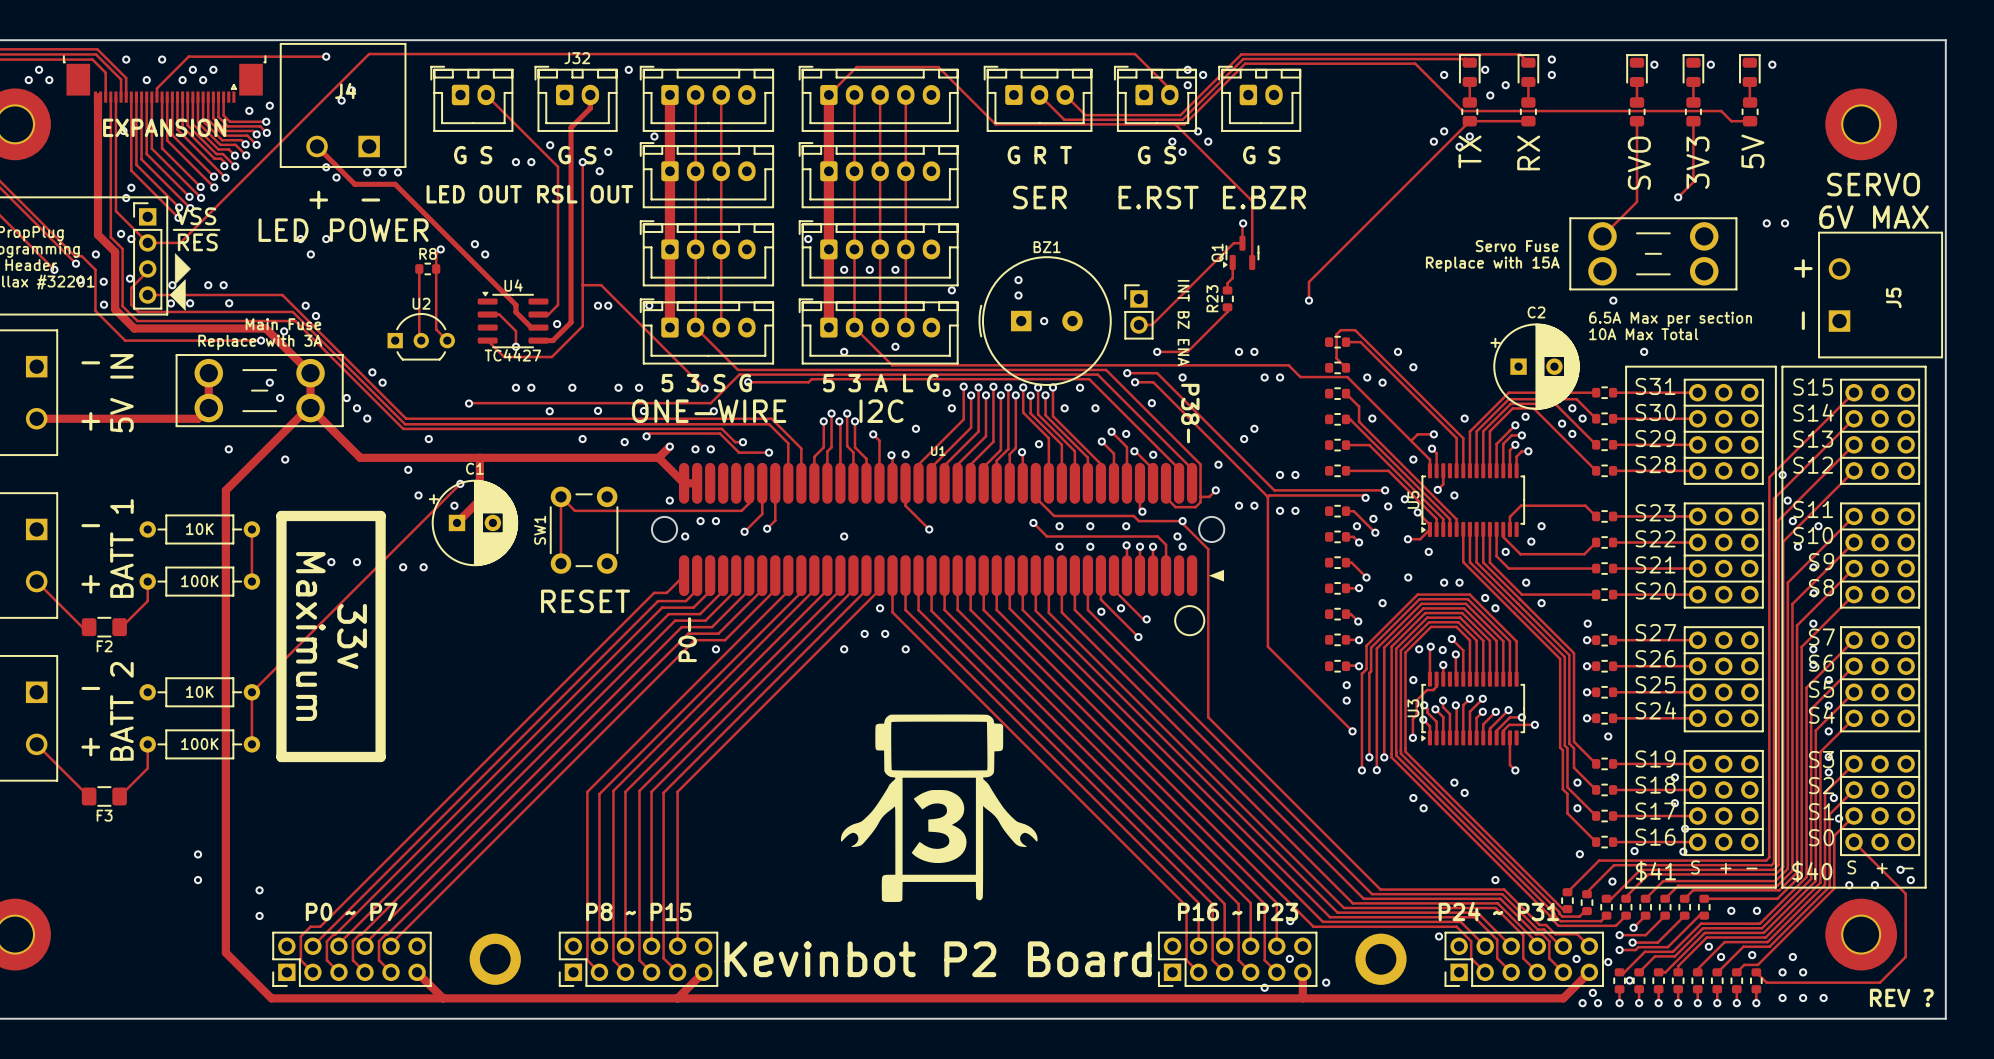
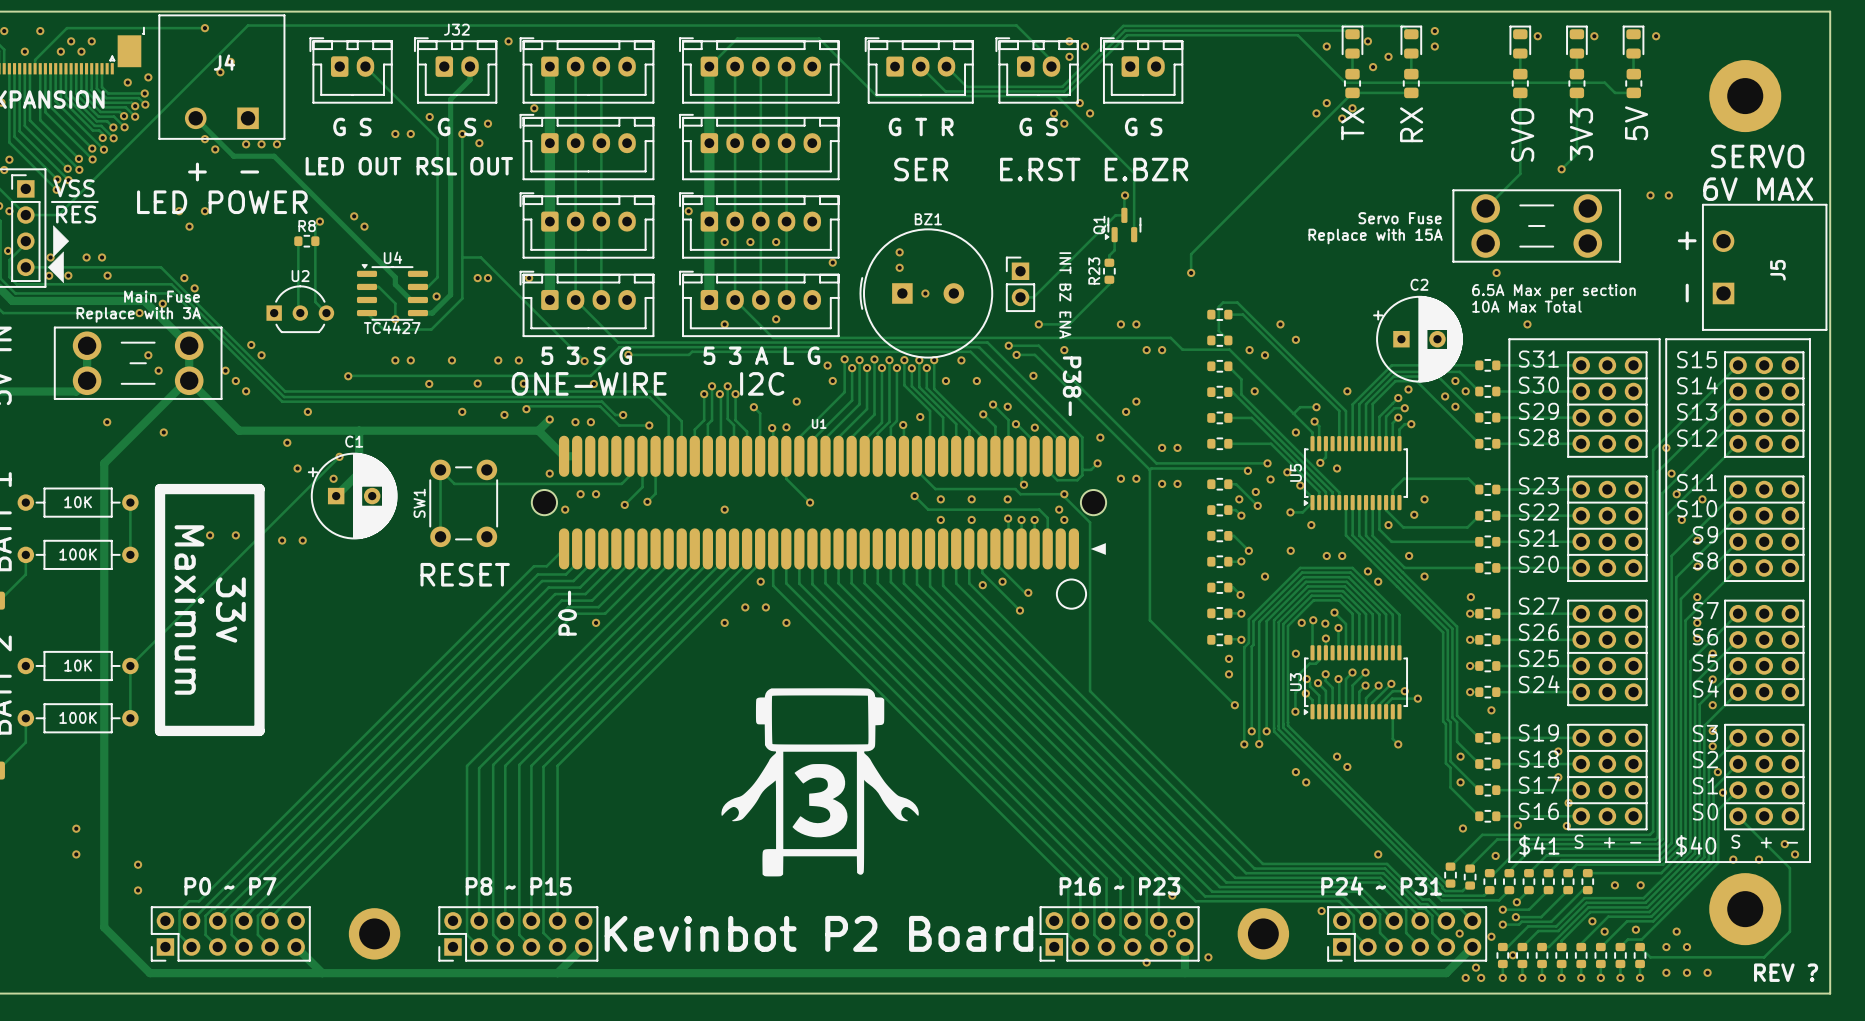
text: R (1040, 155) -> T (921, 127)
text: T (1066, 155) -> R (947, 127)

